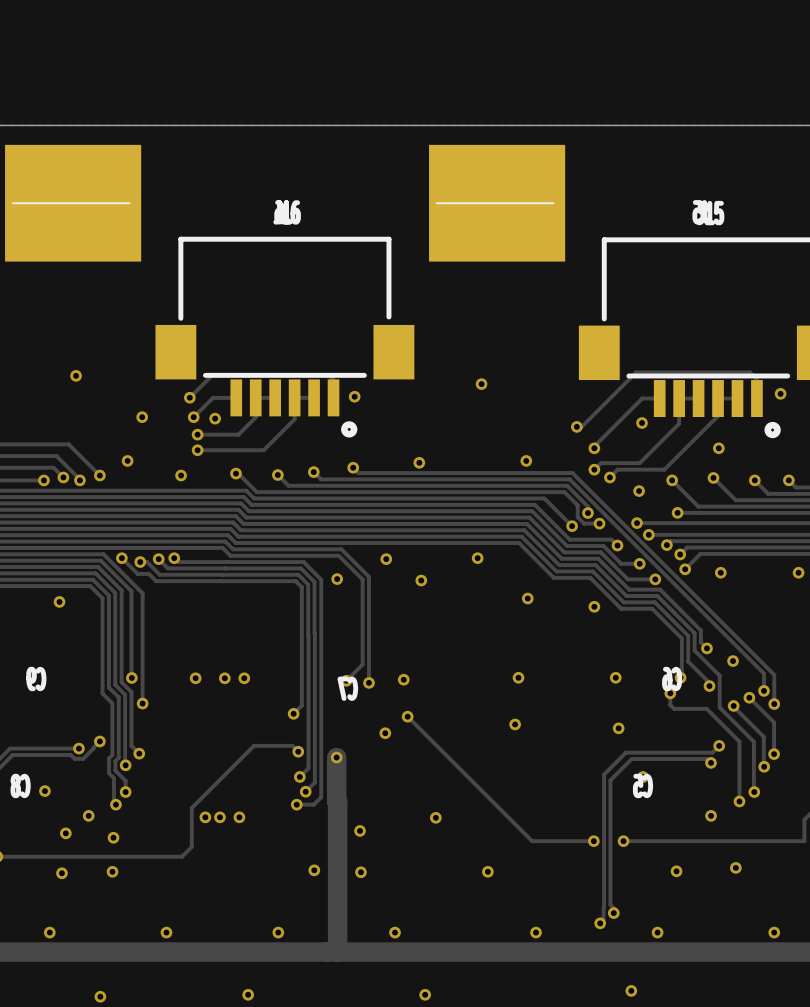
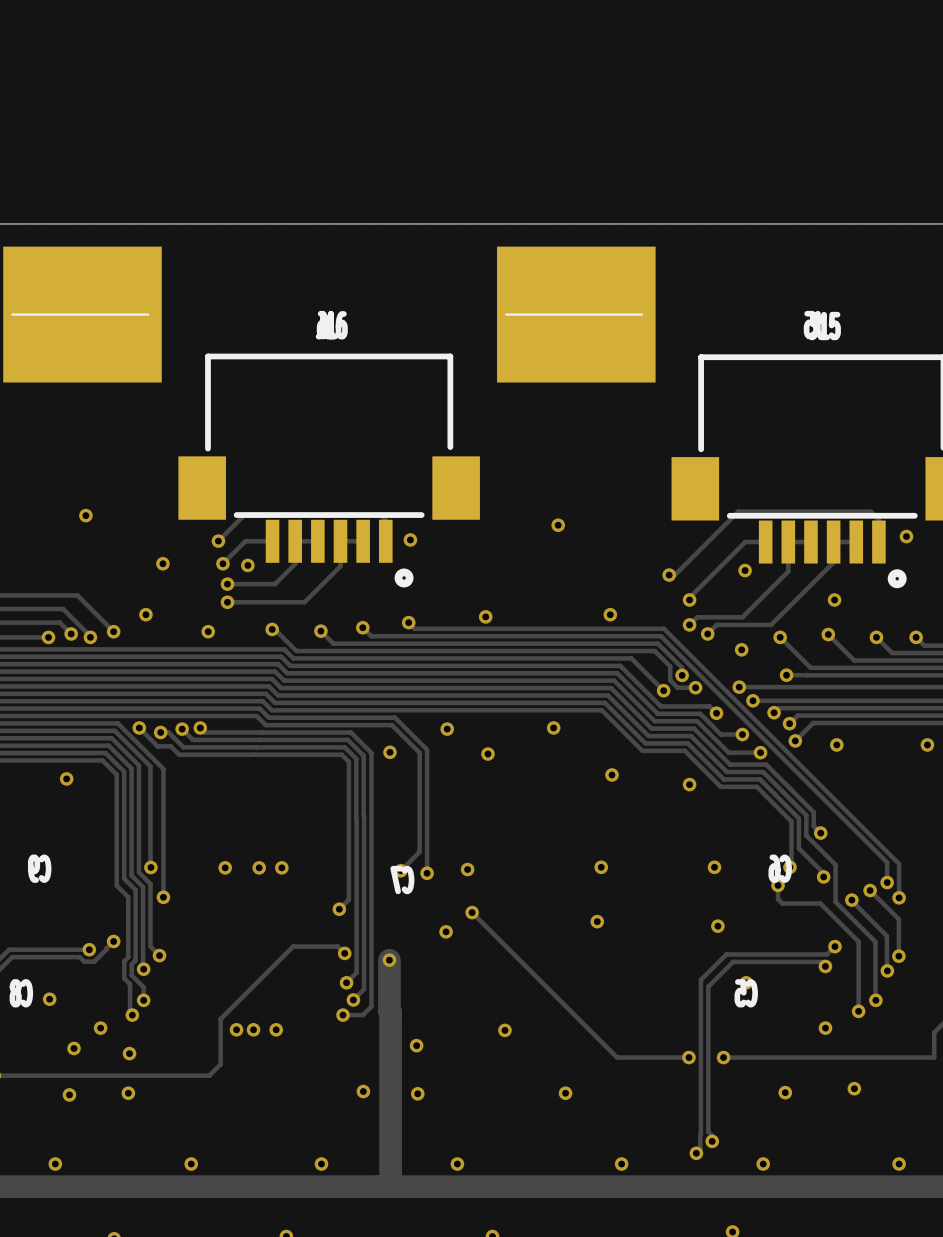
via: (733, 661) -> none

